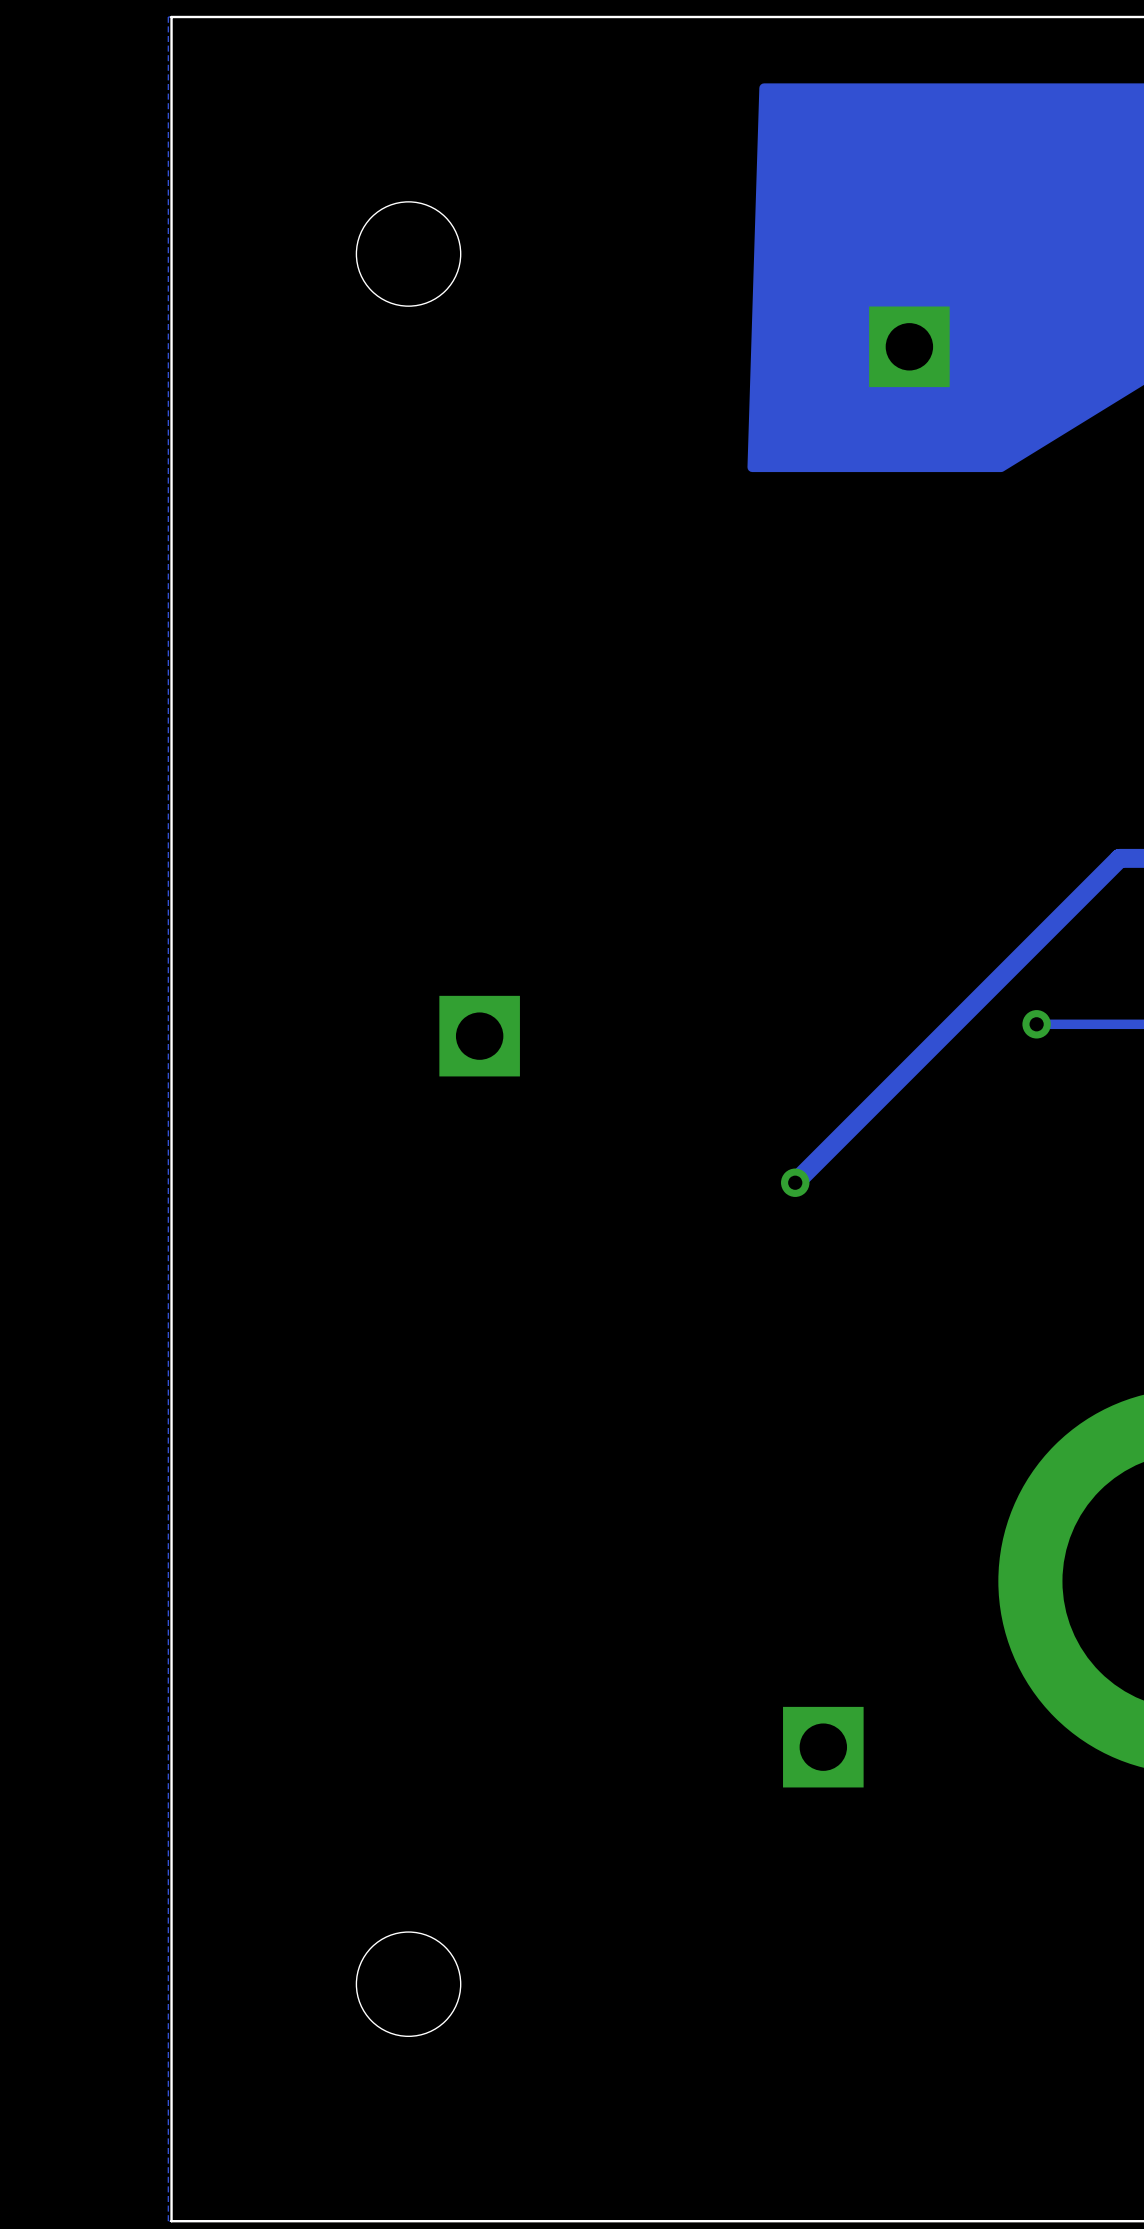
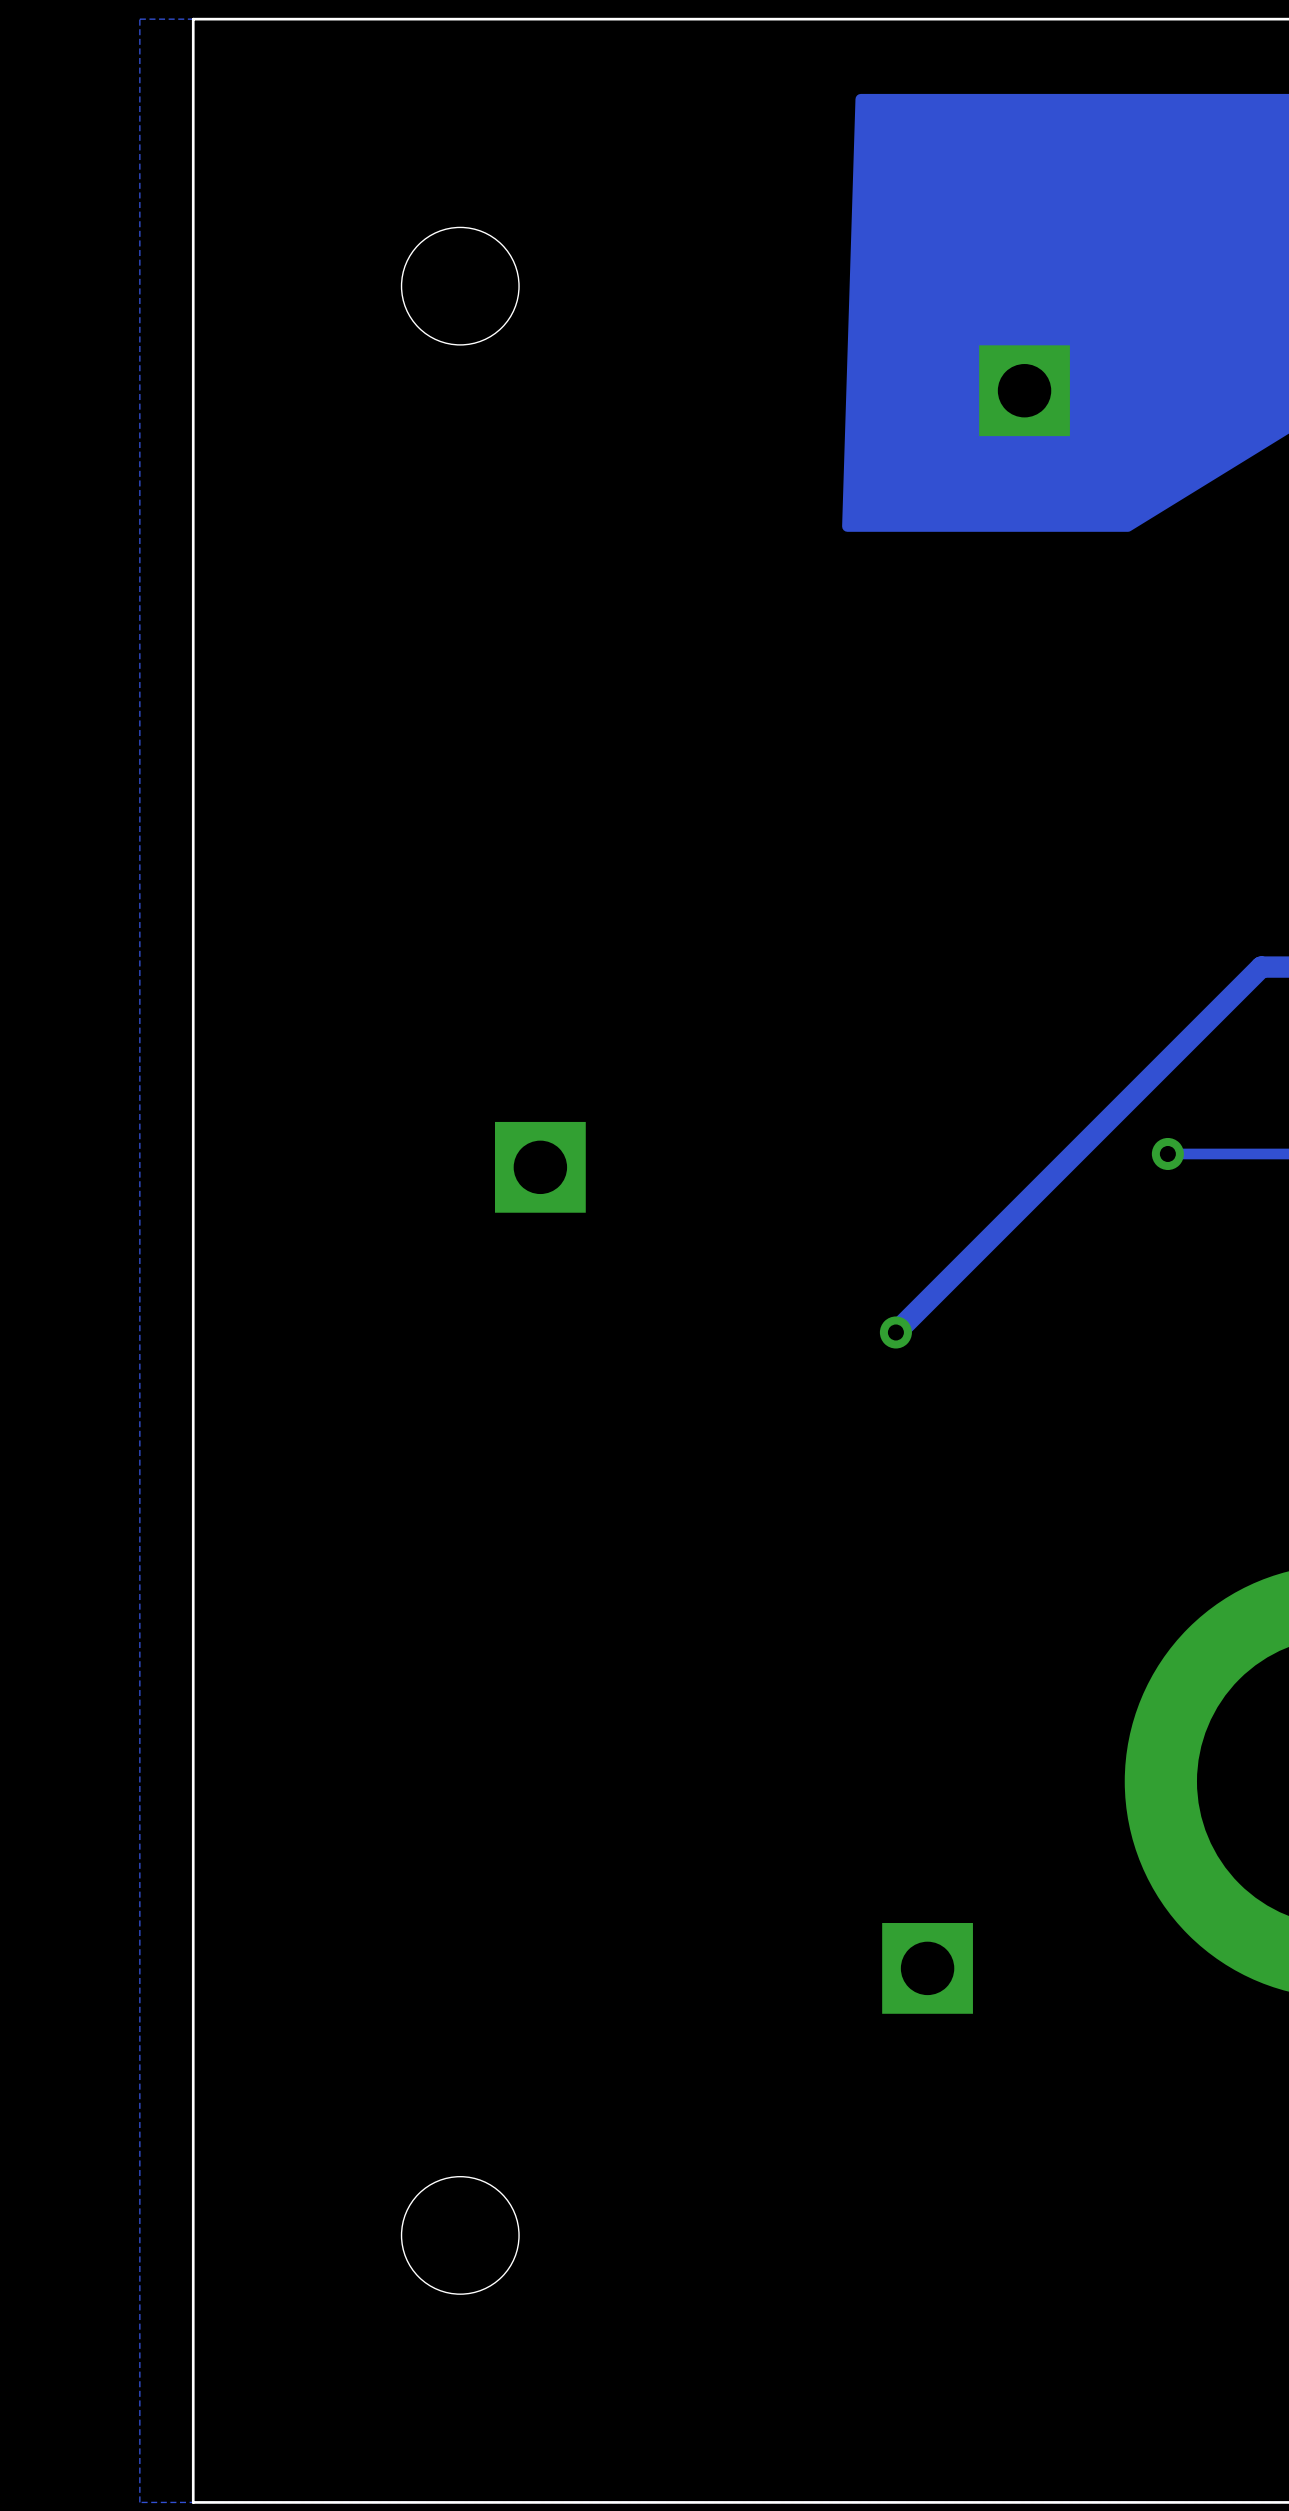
zone outline: (168, 17) (168, 2221) -> (189, 19) (139, 19) (139, 2502) (189, 2502)

